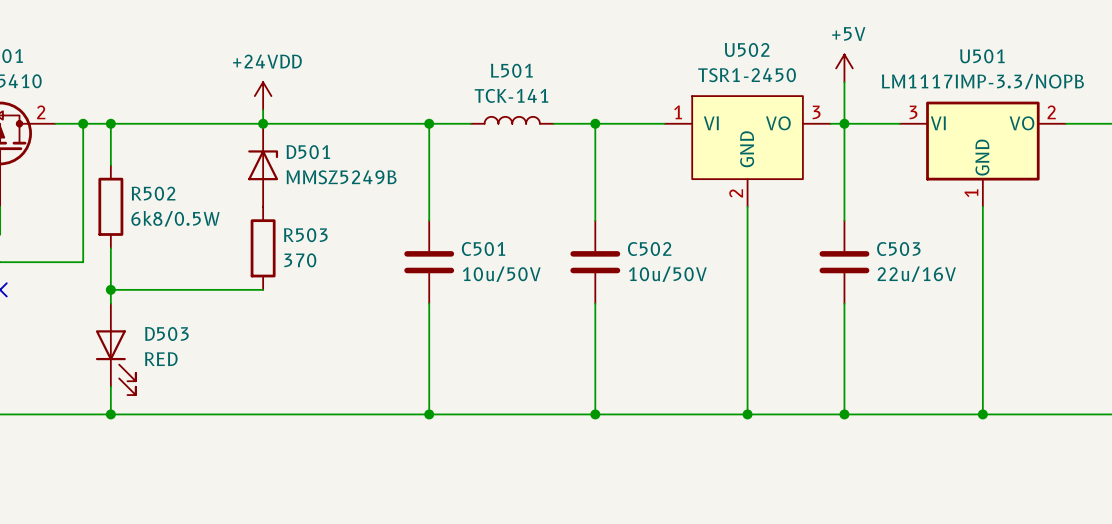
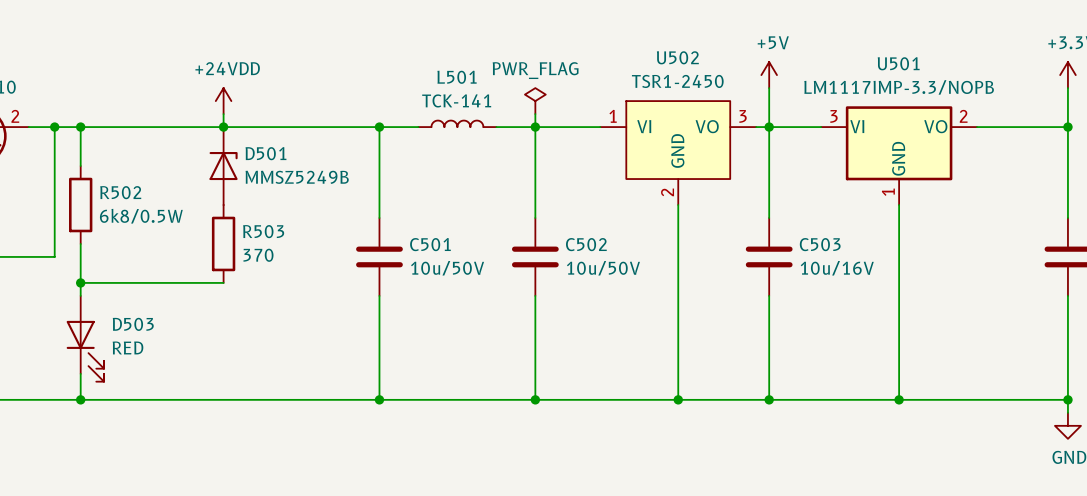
power symbol: none -> PWR_FLAG (535, 101)
wire: none -> (535, 114) (535, 127)
C503 value: 22u/16V (916, 274) -> 10u/16V (837, 268)

